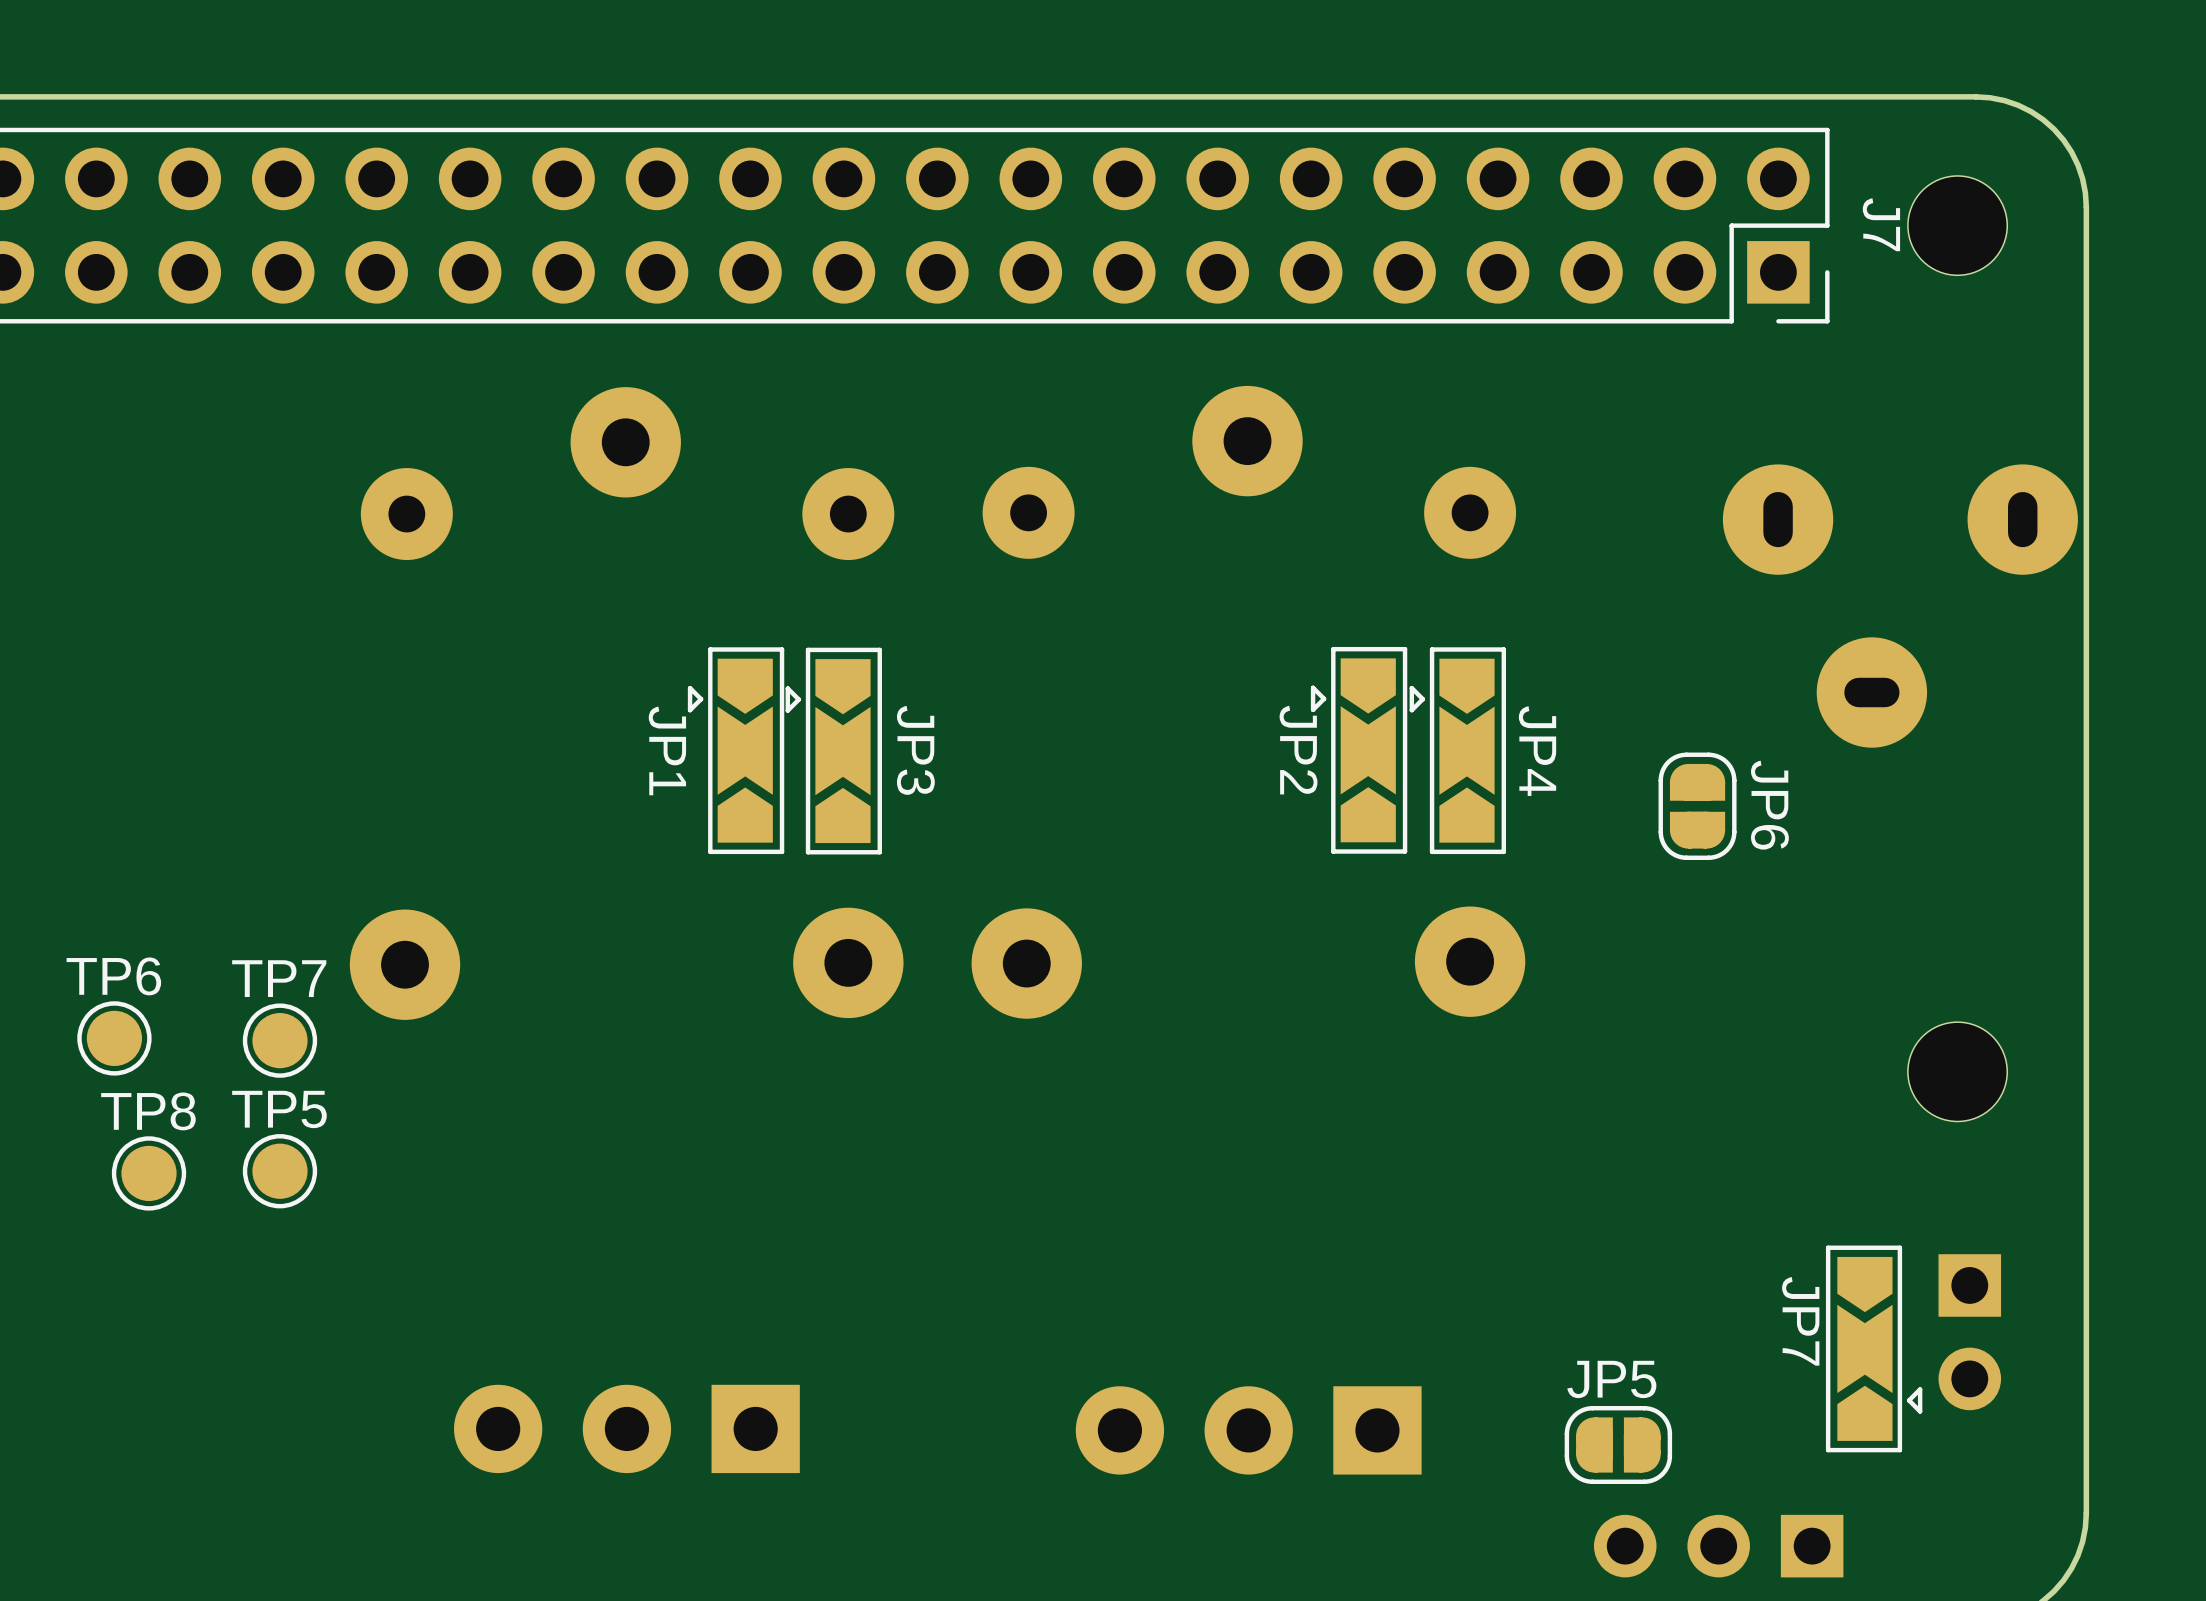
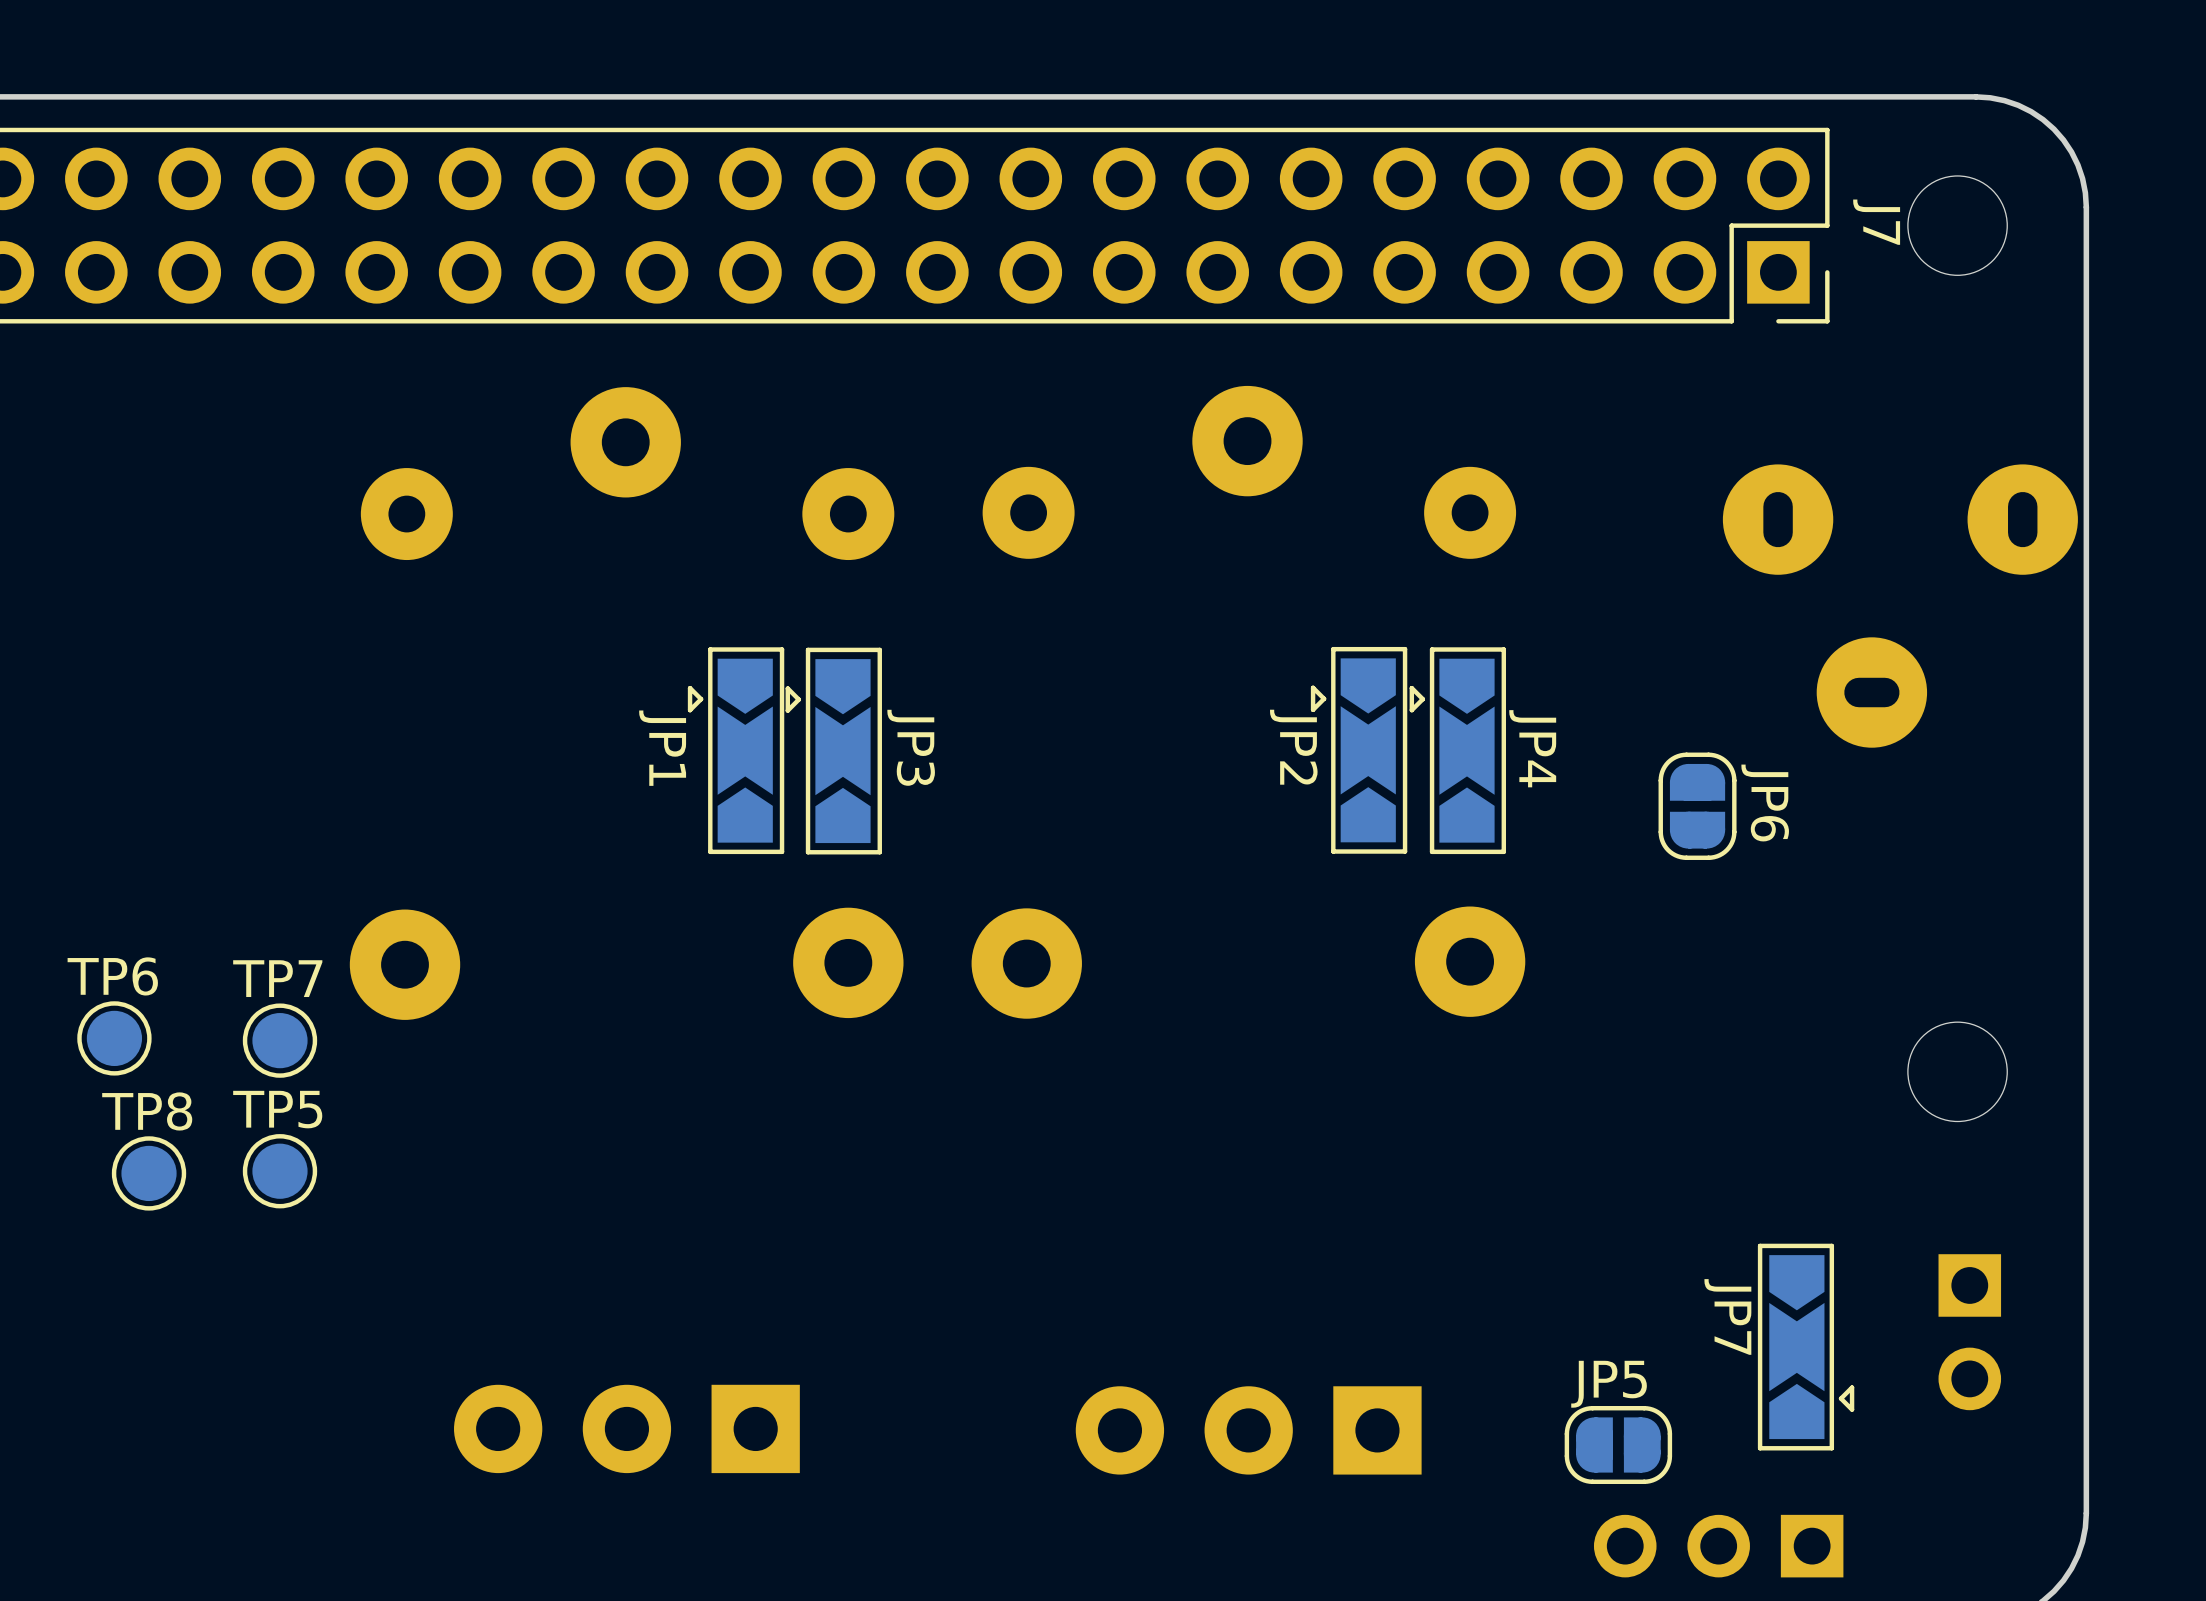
JP7 position: (1874, 1348) -> (1806, 1347)

